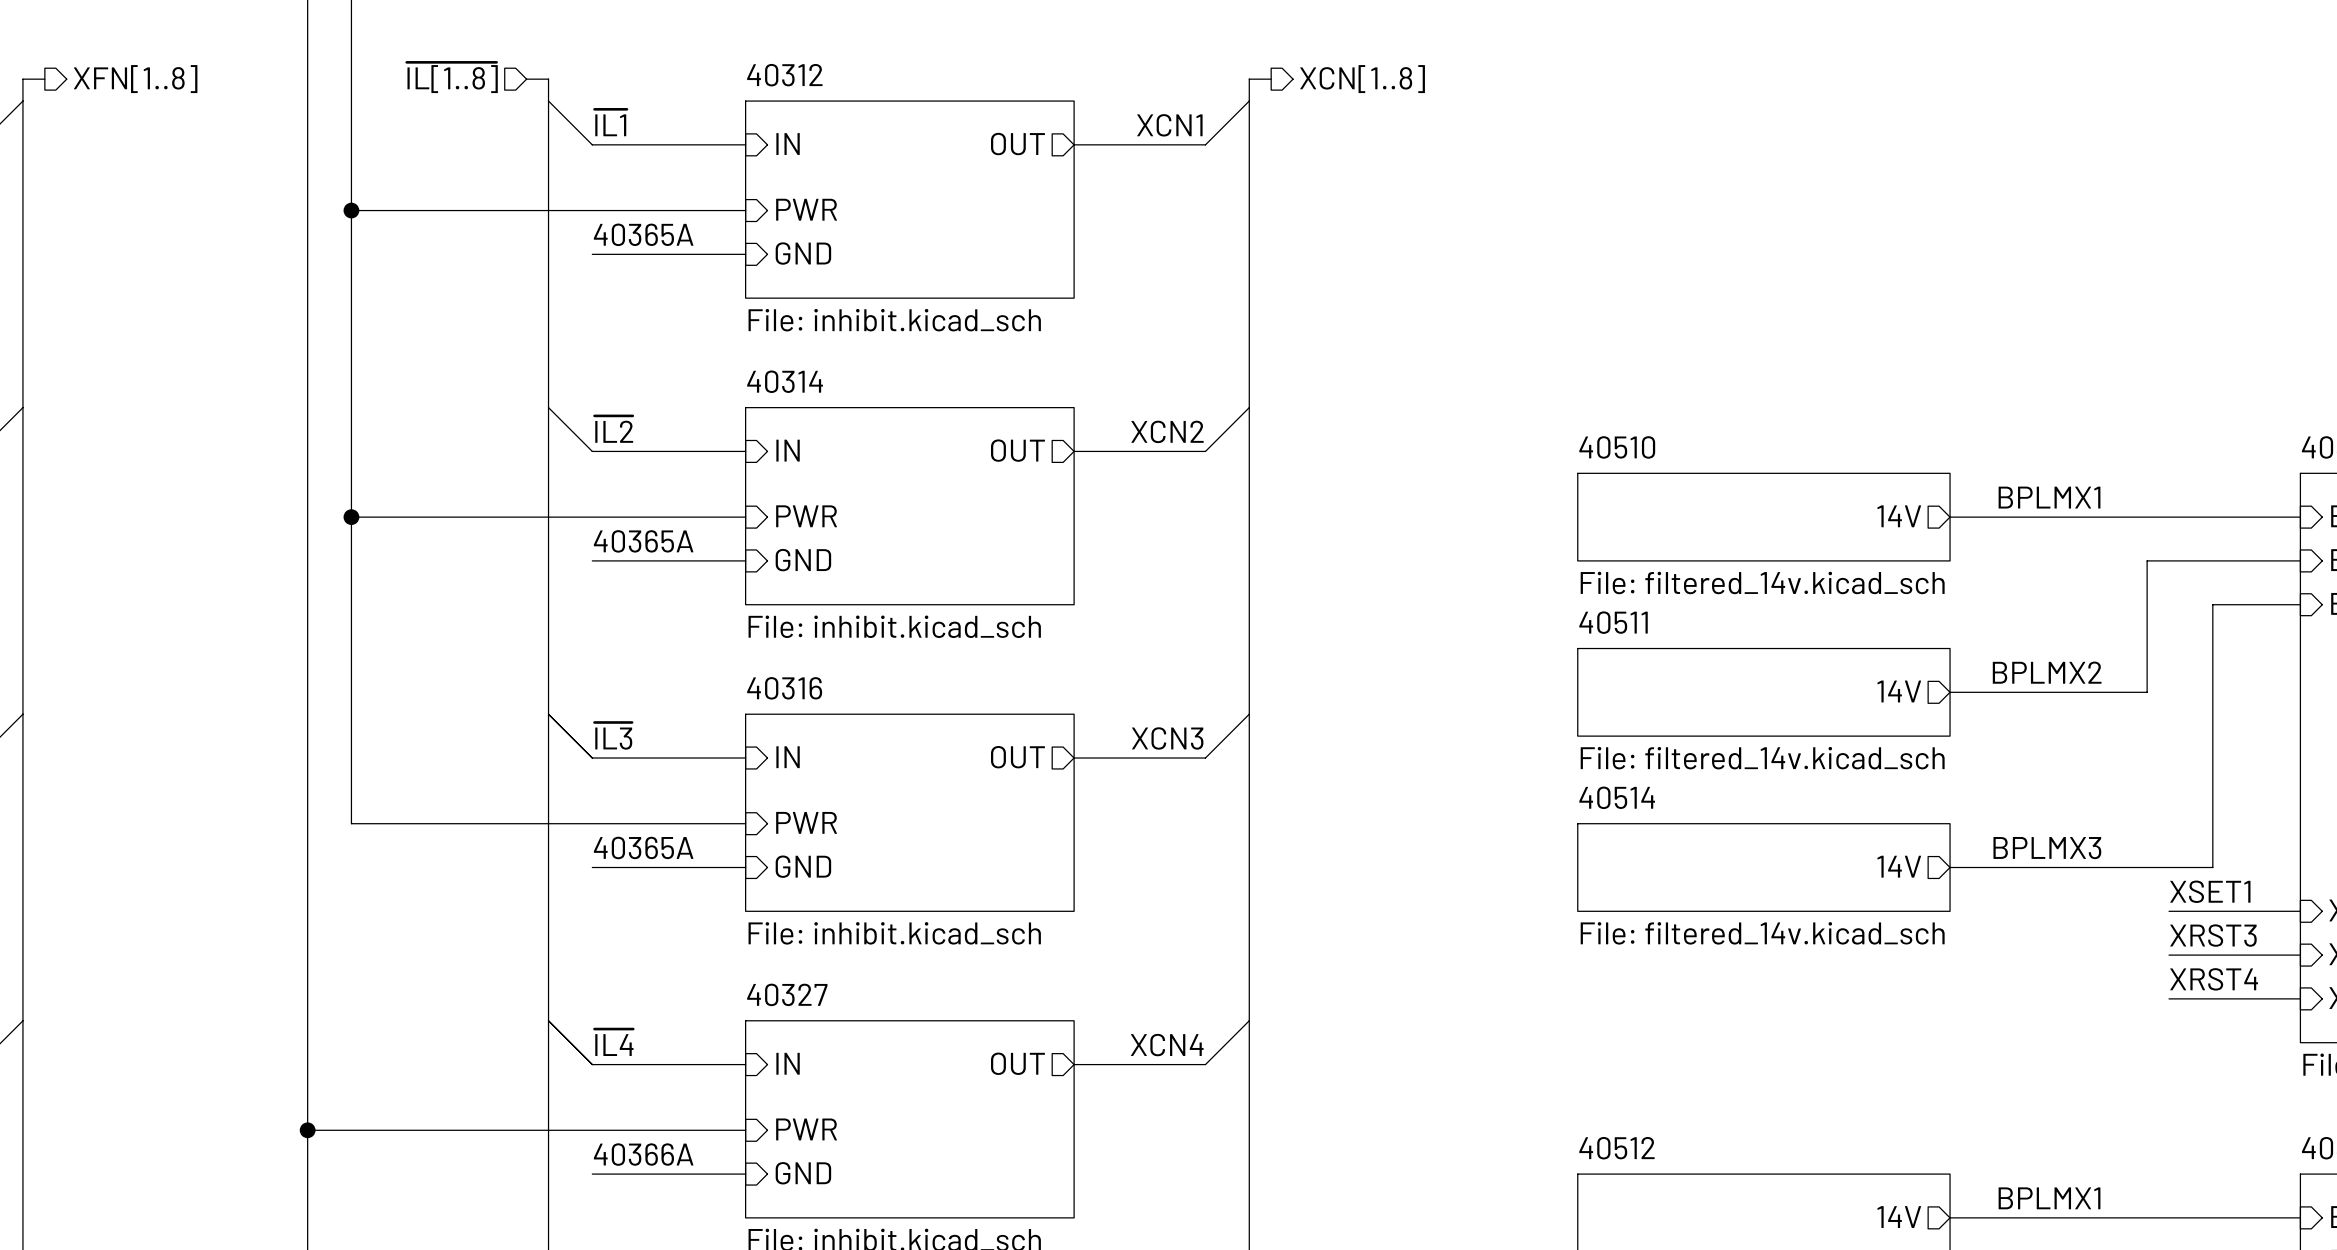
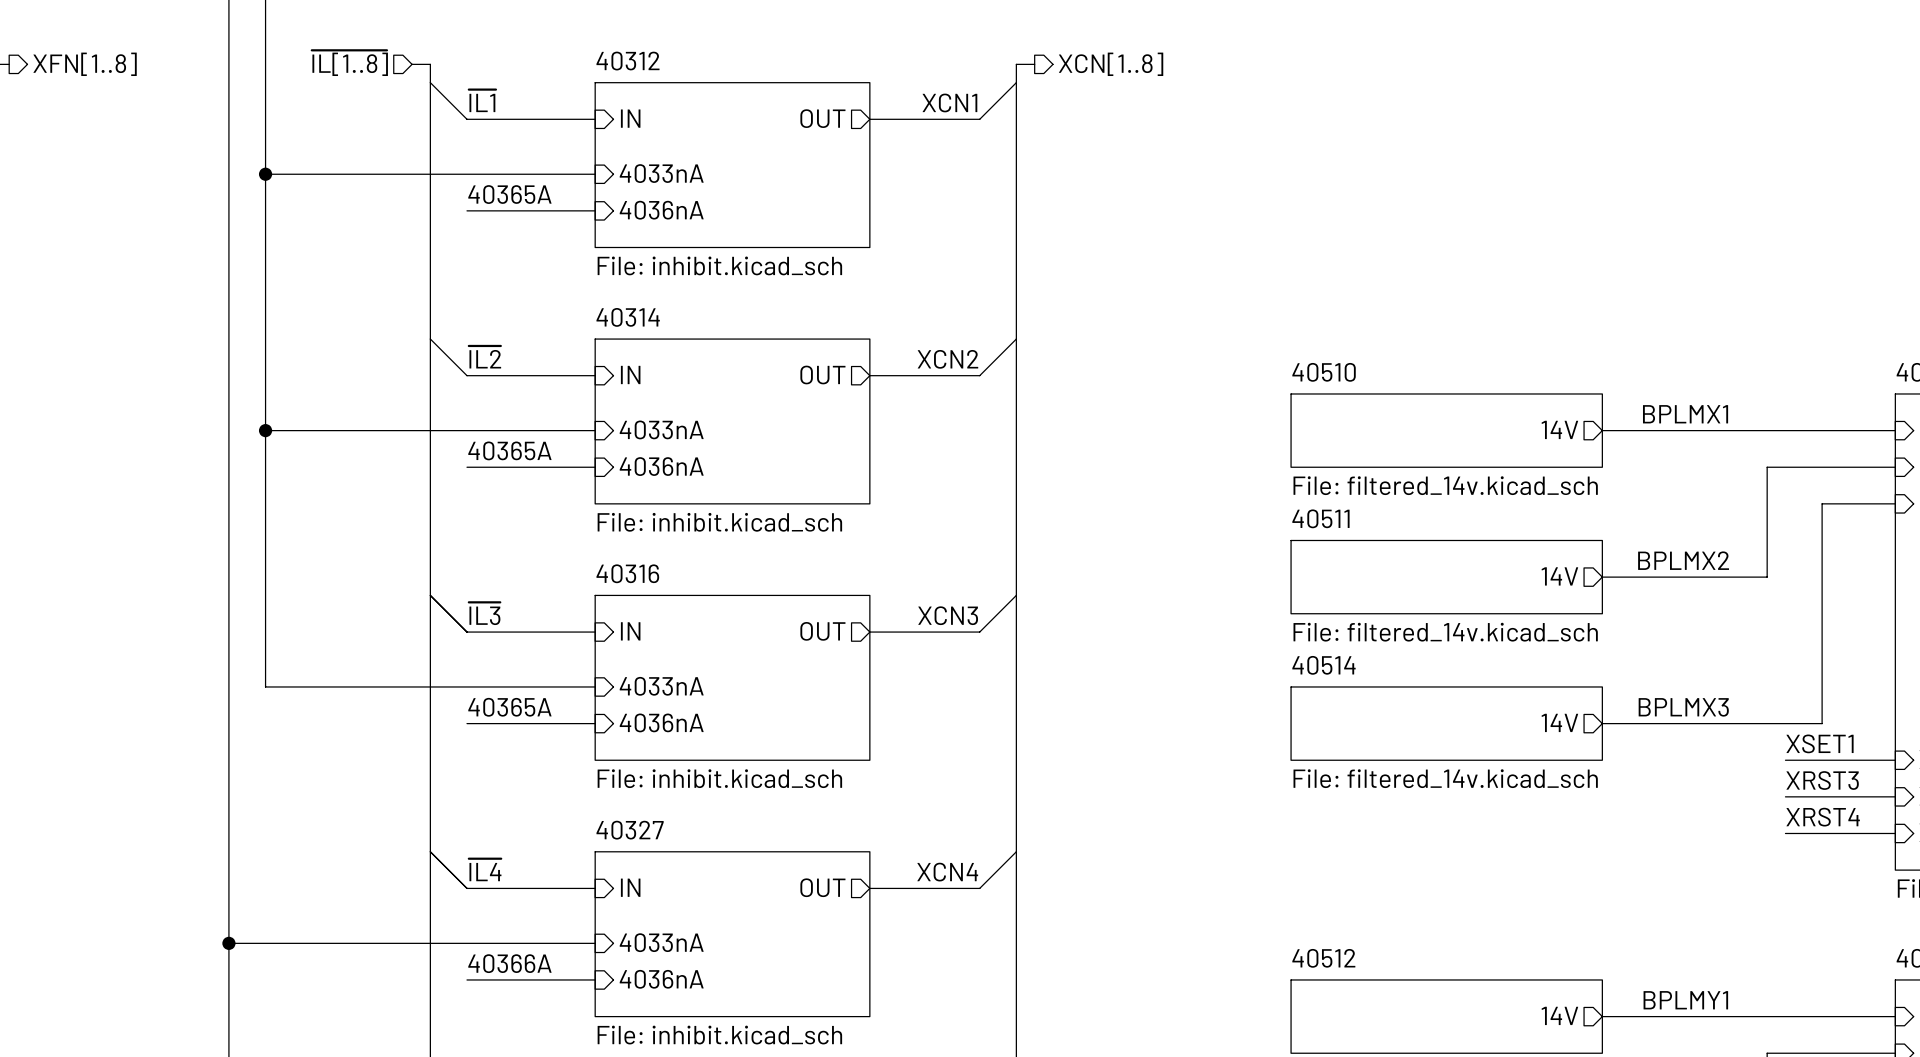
sheet pin: PWR (806, 209) -> 4033nA (661, 173)
sheet pin: GND (803, 253) -> 4036nA (661, 210)
sheet pin: PWR (806, 516) -> 4033nA (661, 429)
sheet pin: GND (803, 560) -> 4036nA (661, 466)
sheet pin: PWR (806, 822) -> 4033nA (661, 686)
sheet pin: GND (803, 866) -> 4036nA (661, 722)
sheet pin: PWR (806, 1129) -> 4033nA (661, 942)
sheet pin: GND (803, 1173) -> 4036nA (661, 979)
label: BPLMX1 (2049, 1198) -> BPLMY1 (1685, 1000)

